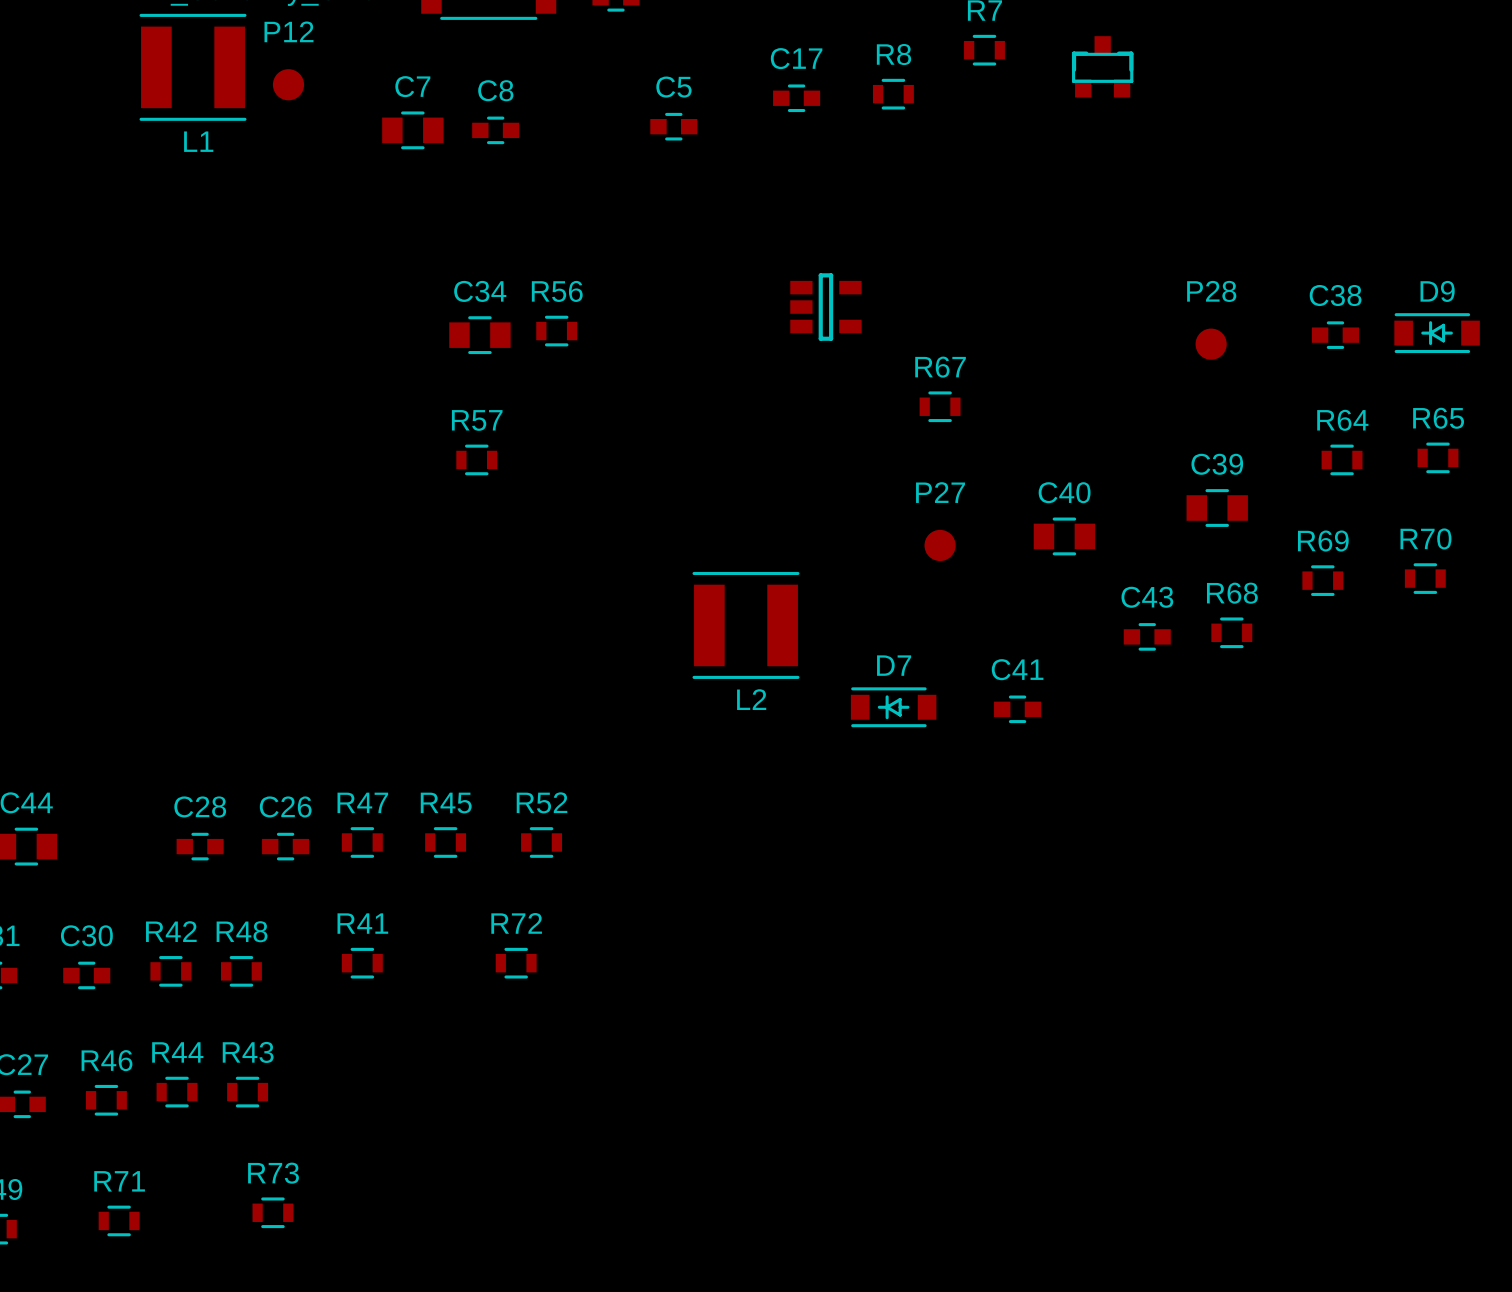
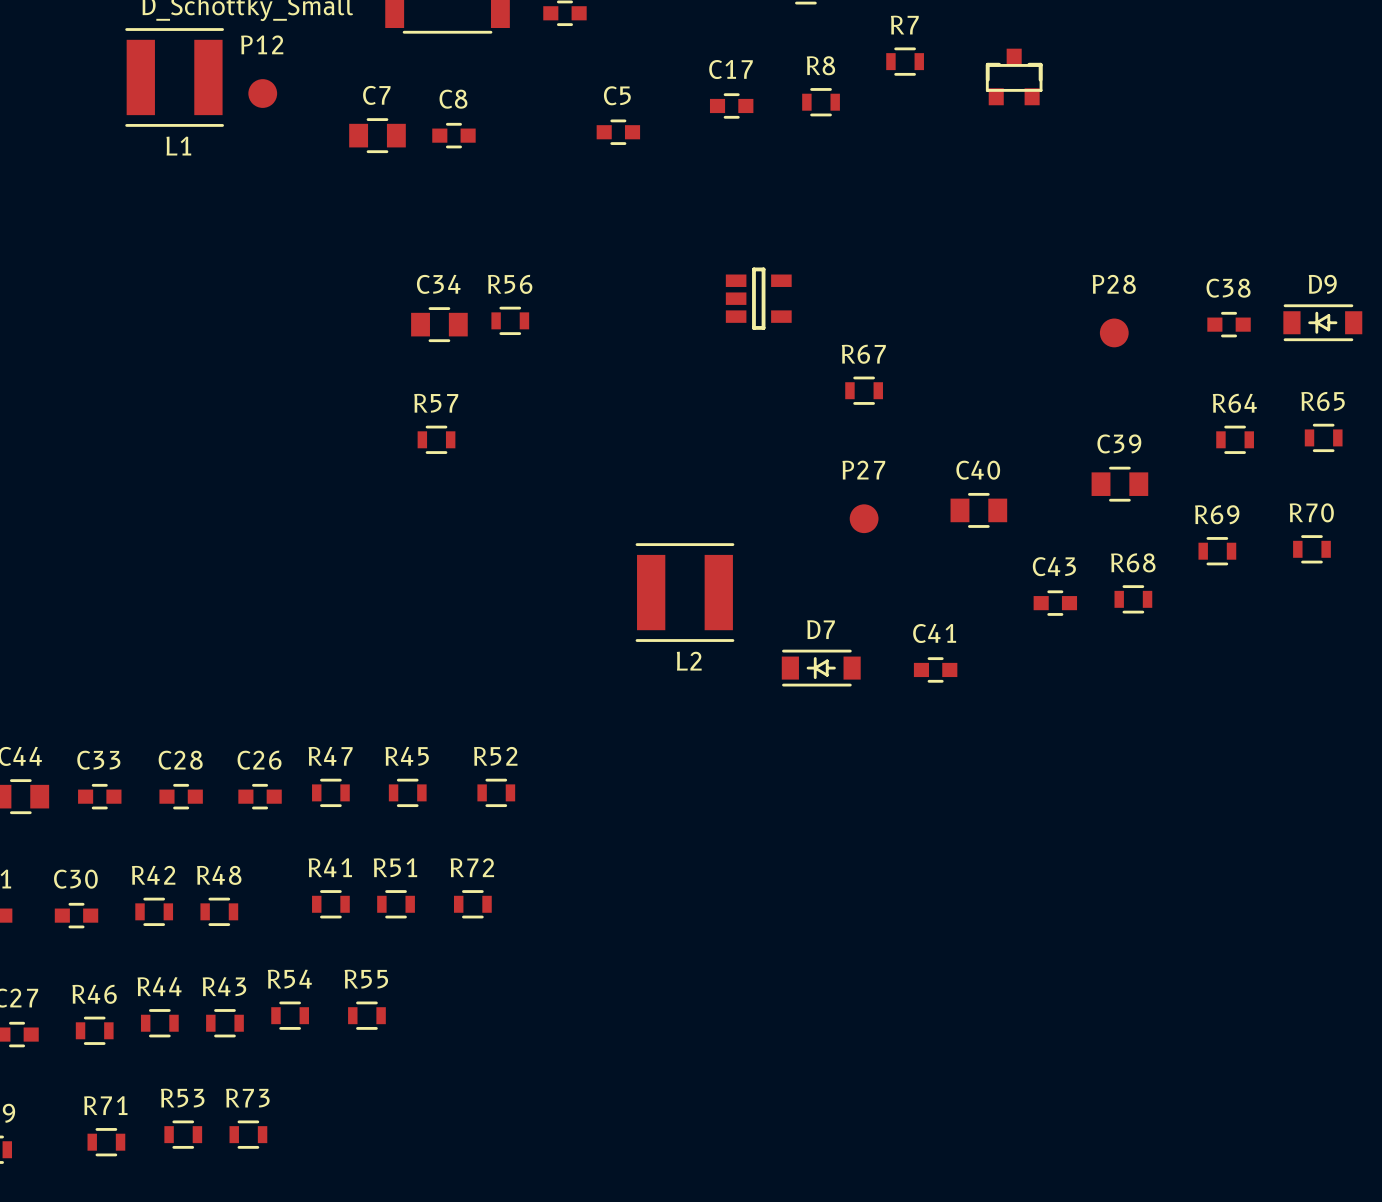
C33: none -> (99, 796)
R51: none -> (396, 904)
R54: none -> (290, 1015)
R55: none -> (366, 1015)
R53: none -> (183, 1134)

